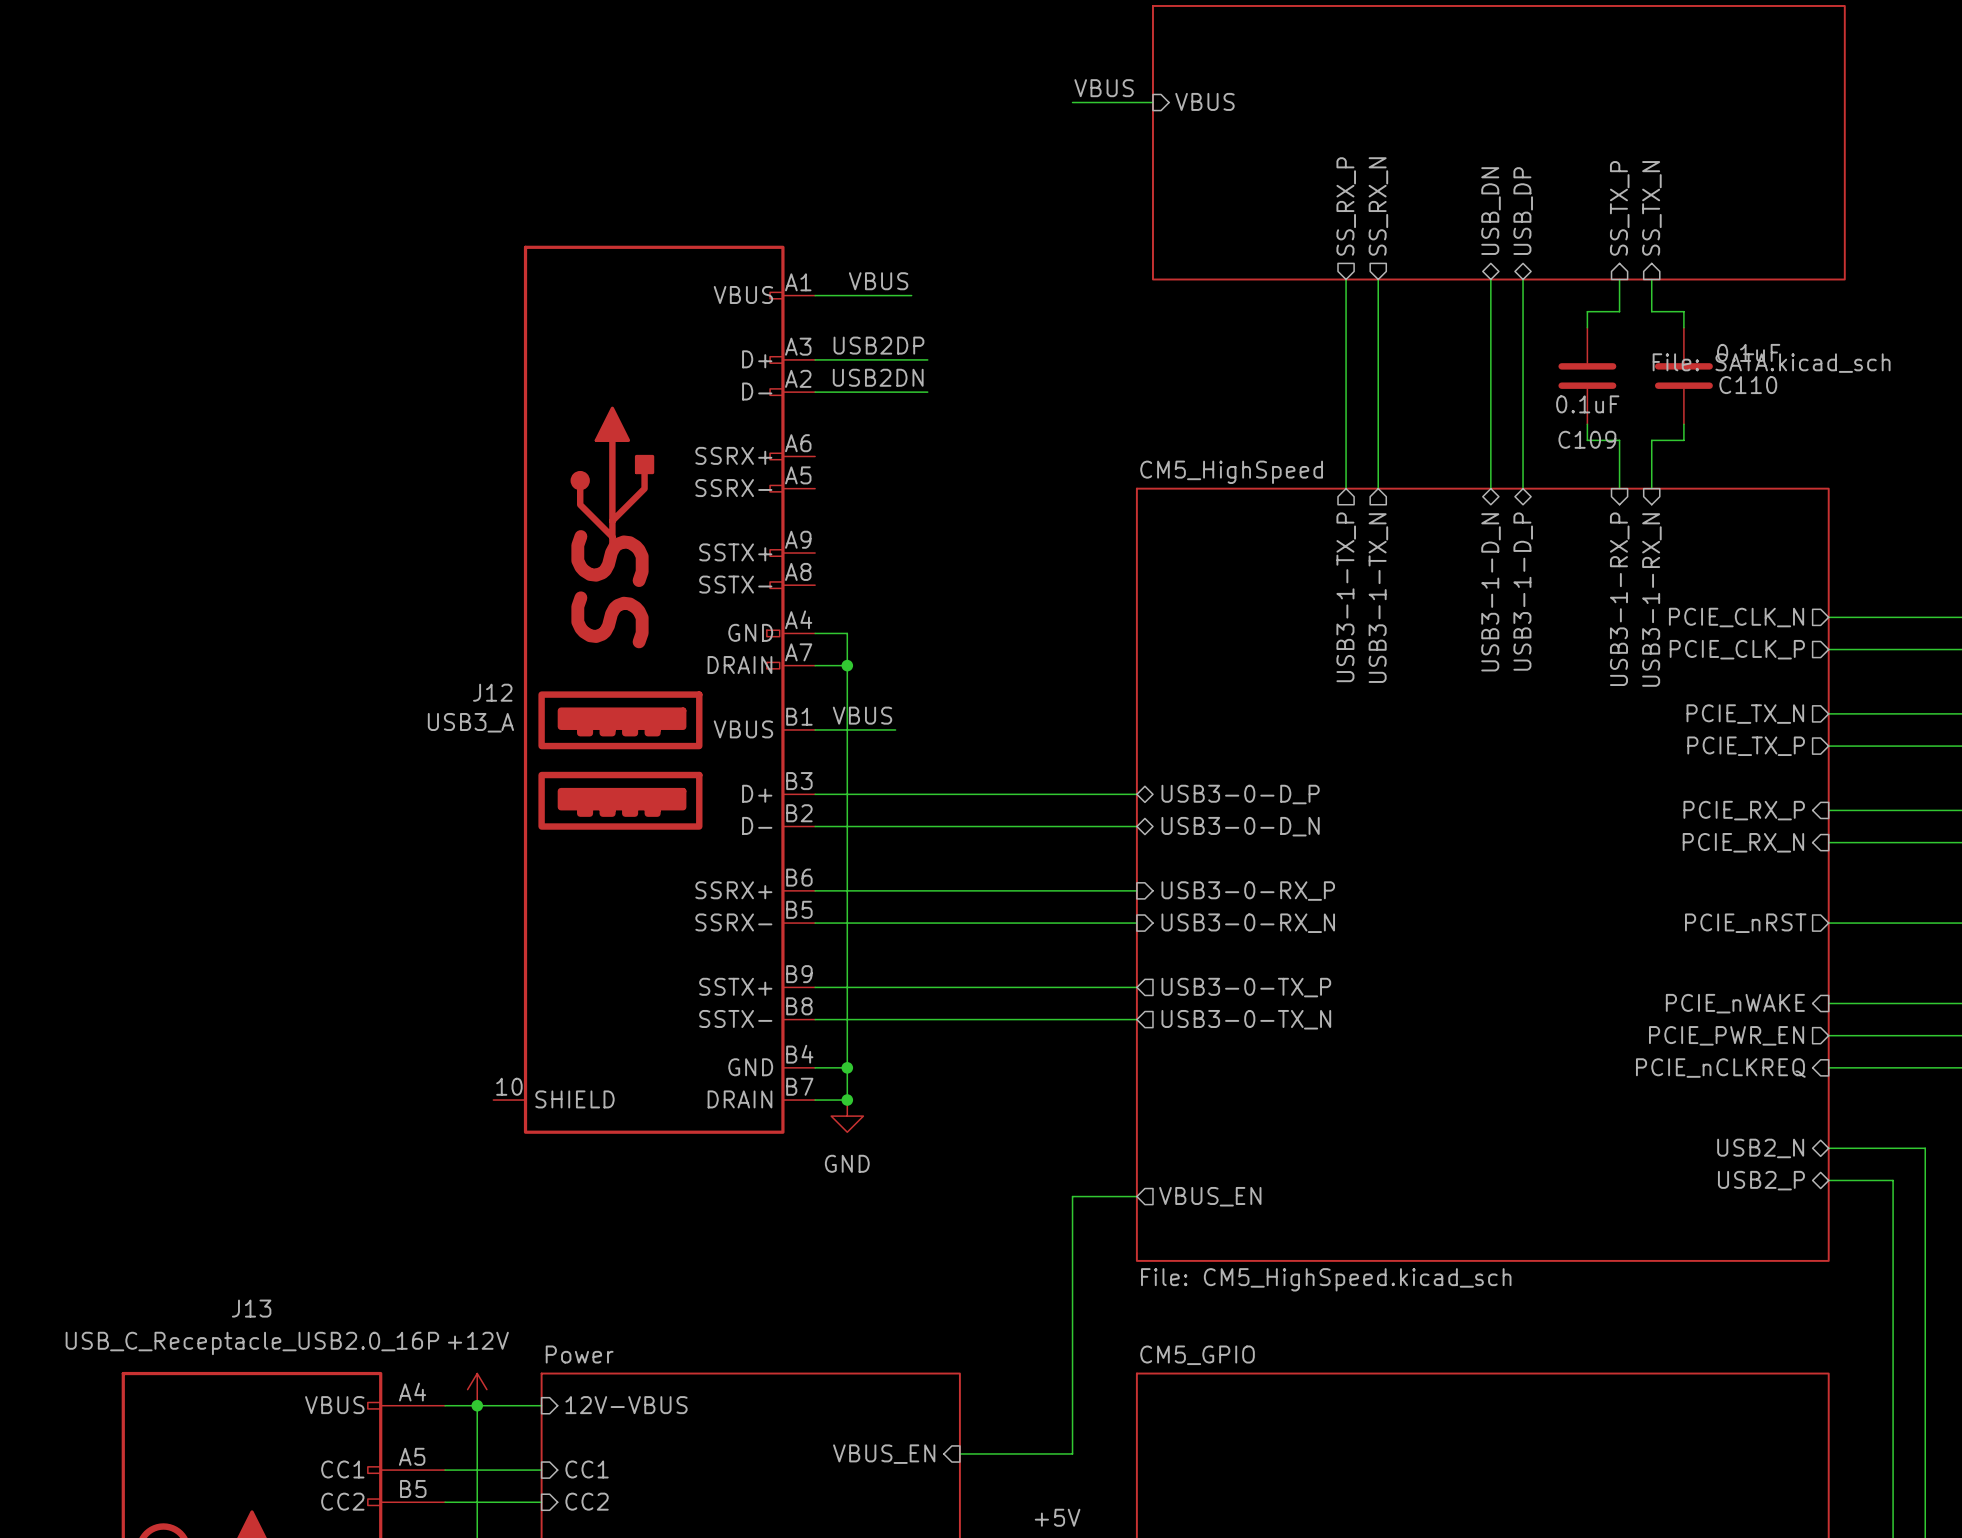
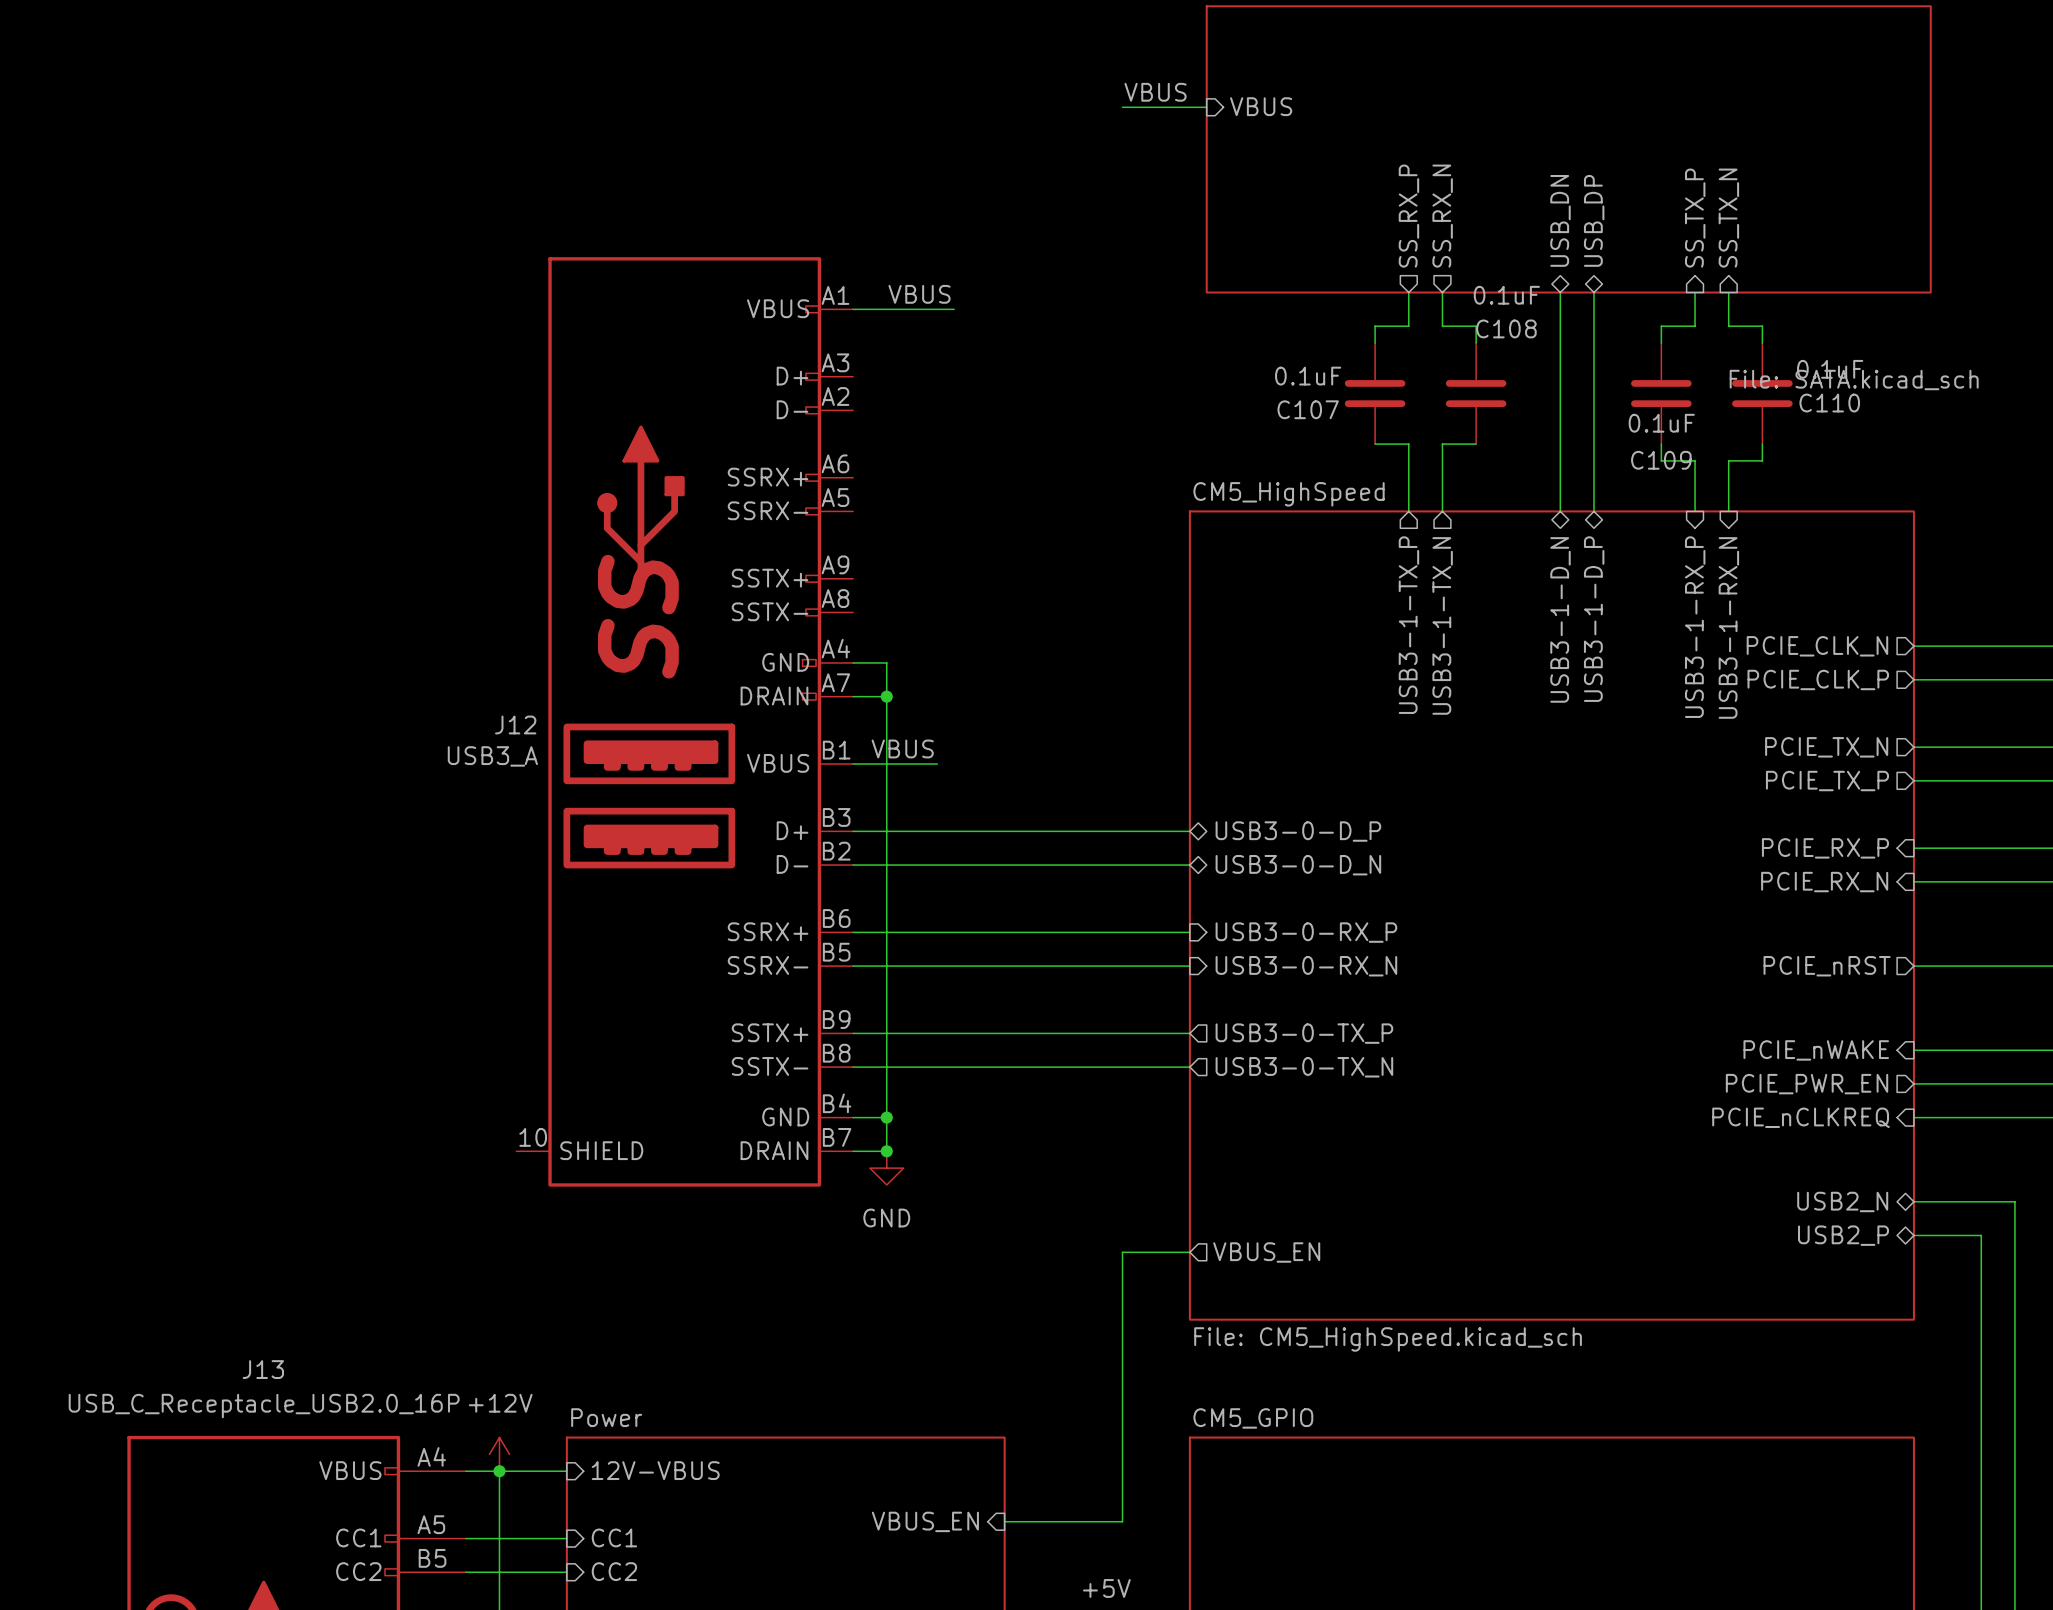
wire: (1346, 311) (1346, 424) -> (1408, 326) (1375, 326) (1375, 343)
wire: (1378, 311) (1378, 424) -> (1442, 326) (1476, 326) (1476, 343)
label: USB2DP (878, 345) -> none
wire: (815, 359) (927, 359) -> none
C107: none -> 0.1uF (1375, 393)
C108: none -> 0.1uF (1476, 393)
label: USB2DN (878, 377) -> none
wire: (815, 392) (927, 392) -> none
wire: none -> (1375, 444) (1408, 444)
wire: none -> (1442, 444) (1476, 444)

